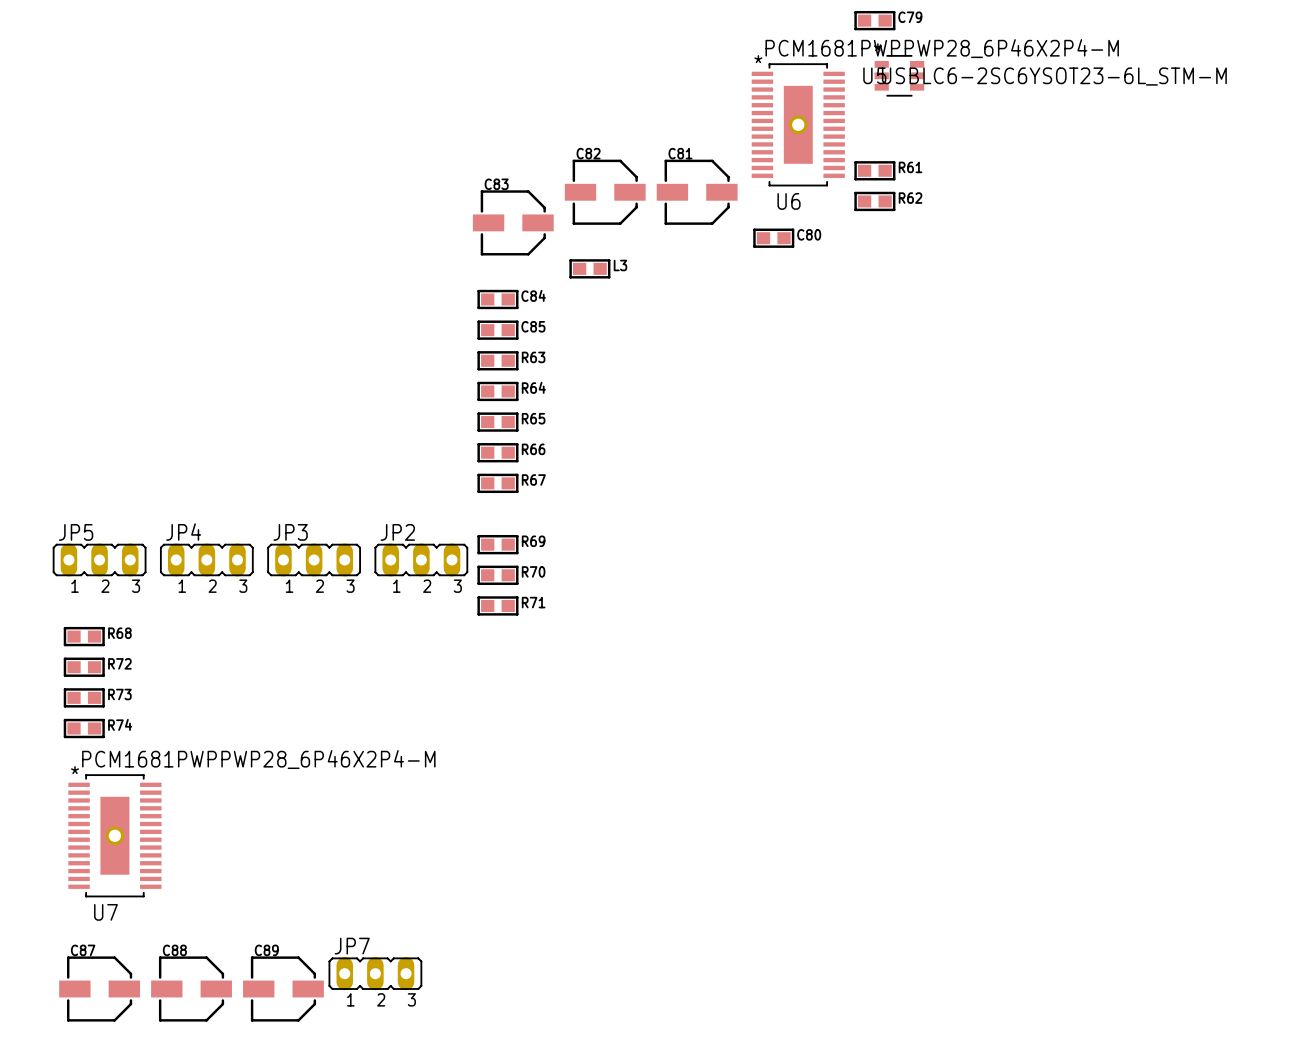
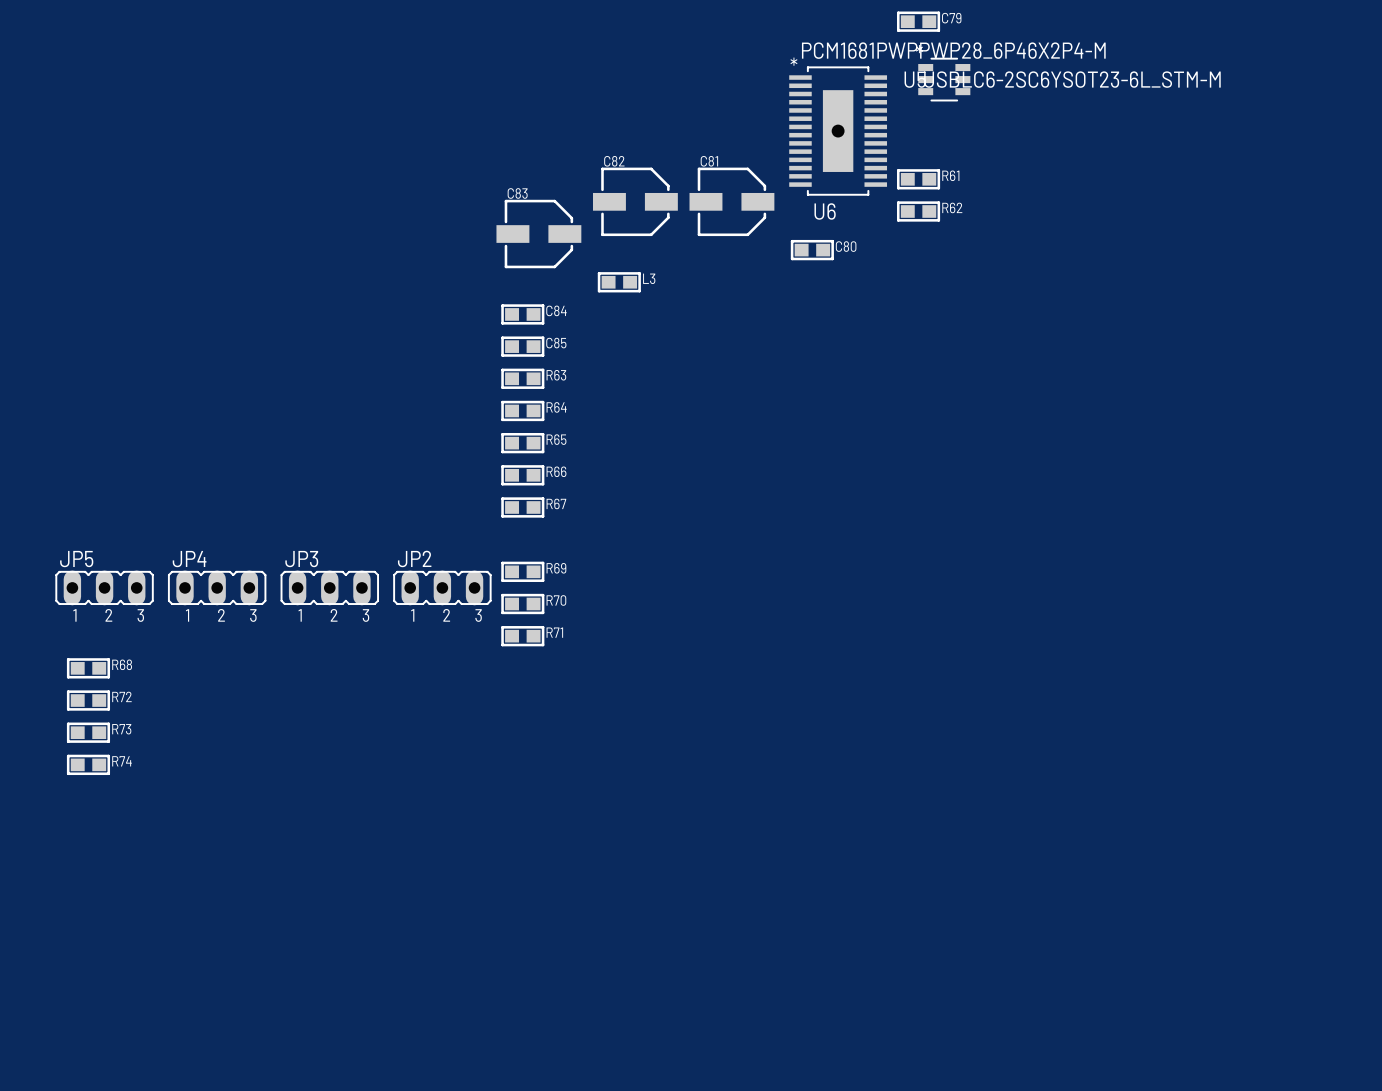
U7: PCM1681PWPPWP28_6P46X2P4-M (114, 835) -> none
JP7: (375, 973) -> none
C87: (99, 989) -> none
C88: (191, 989) -> none
C89: (283, 989) -> none

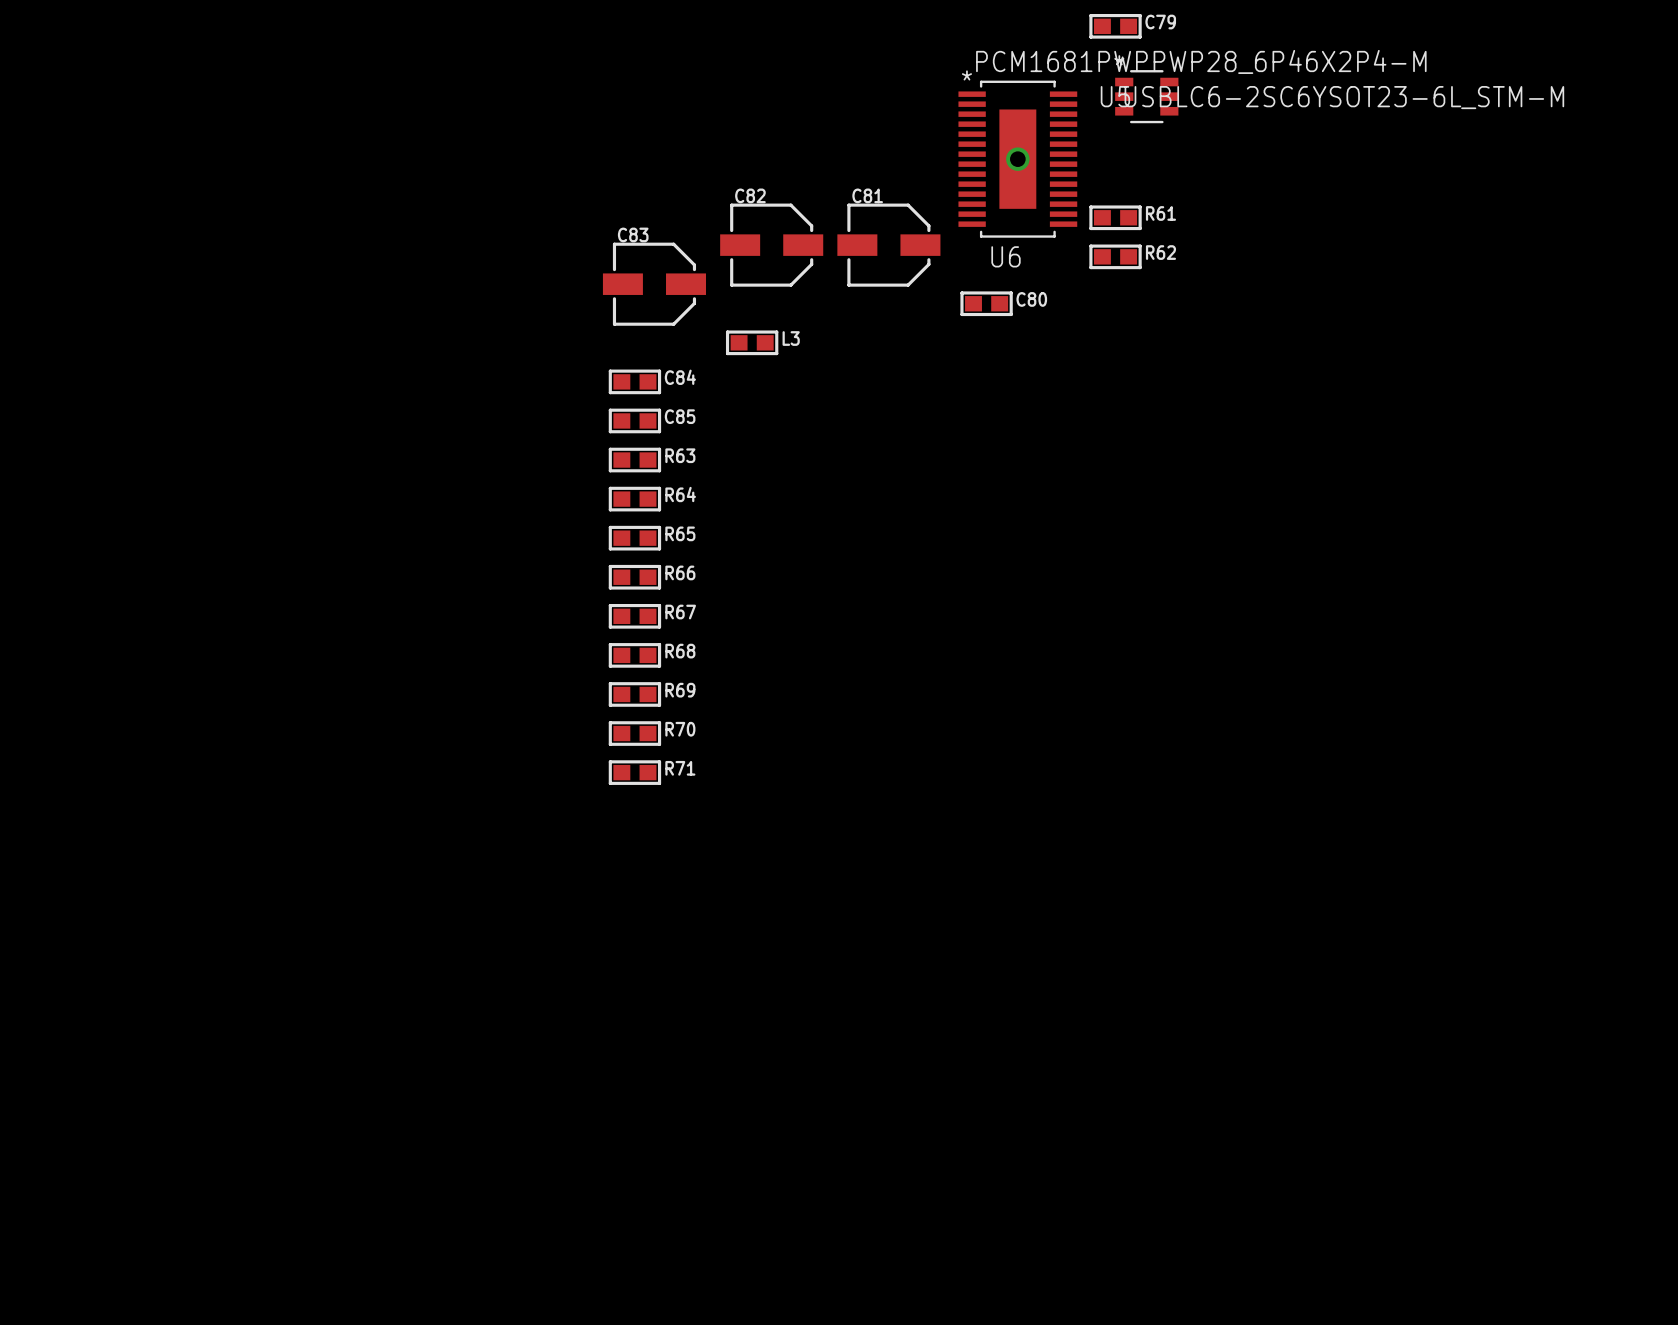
JP5: (104, 587) -> none
JP4: (217, 587) -> none
JP3: (329, 587) -> none
JP2: (442, 587) -> none
R68 position: (88, 668) -> (634, 655)
R72: (88, 700) -> none
R73: (88, 732) -> none
R74: (88, 764) -> none

